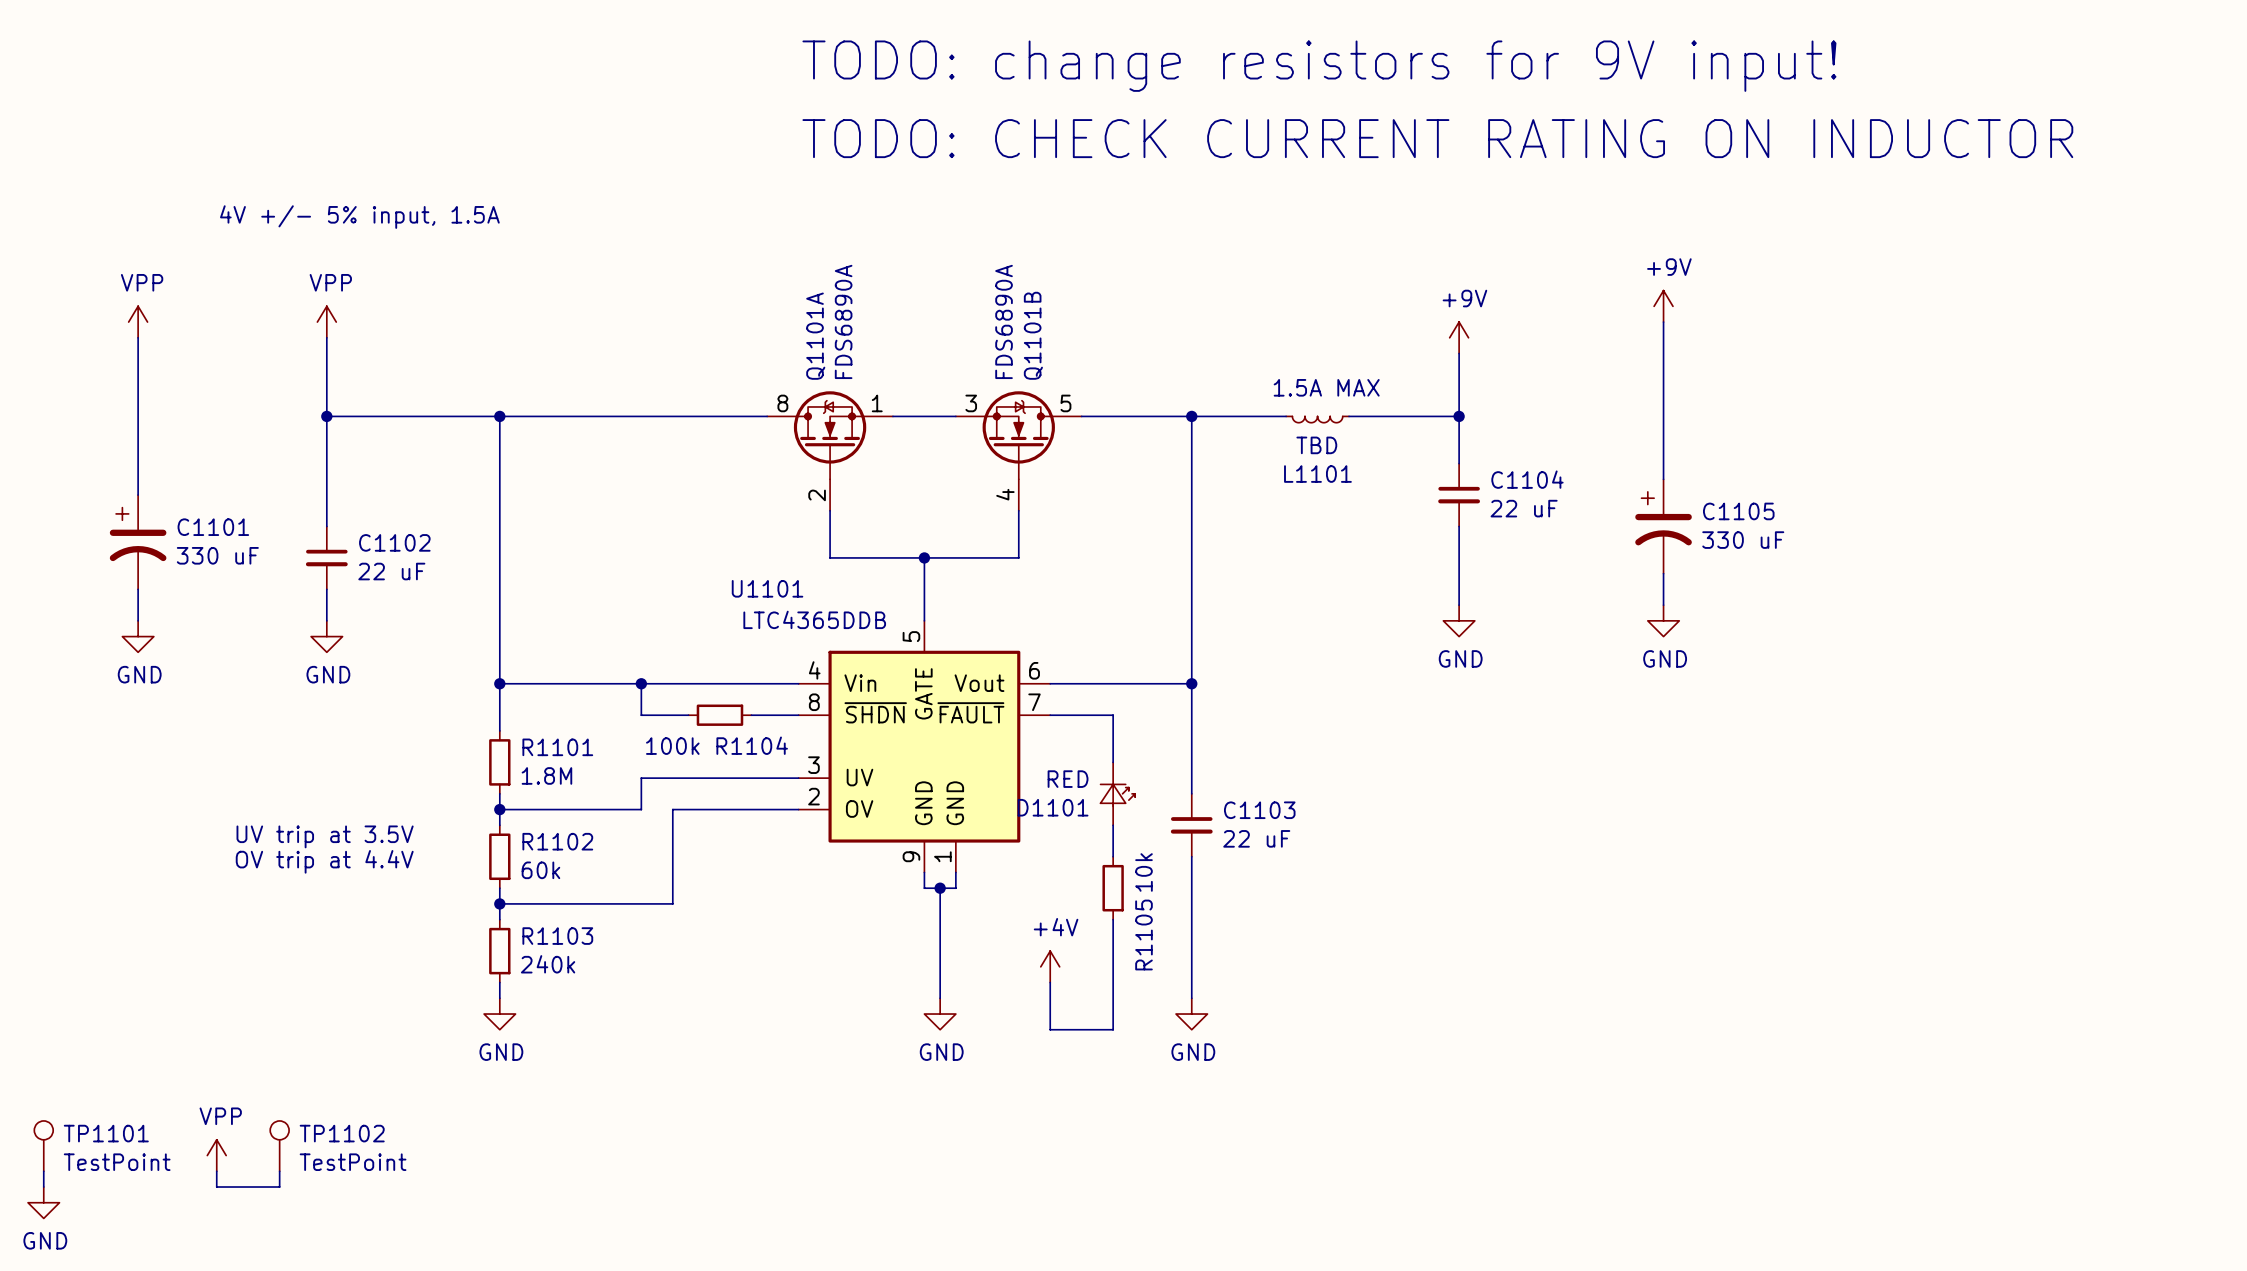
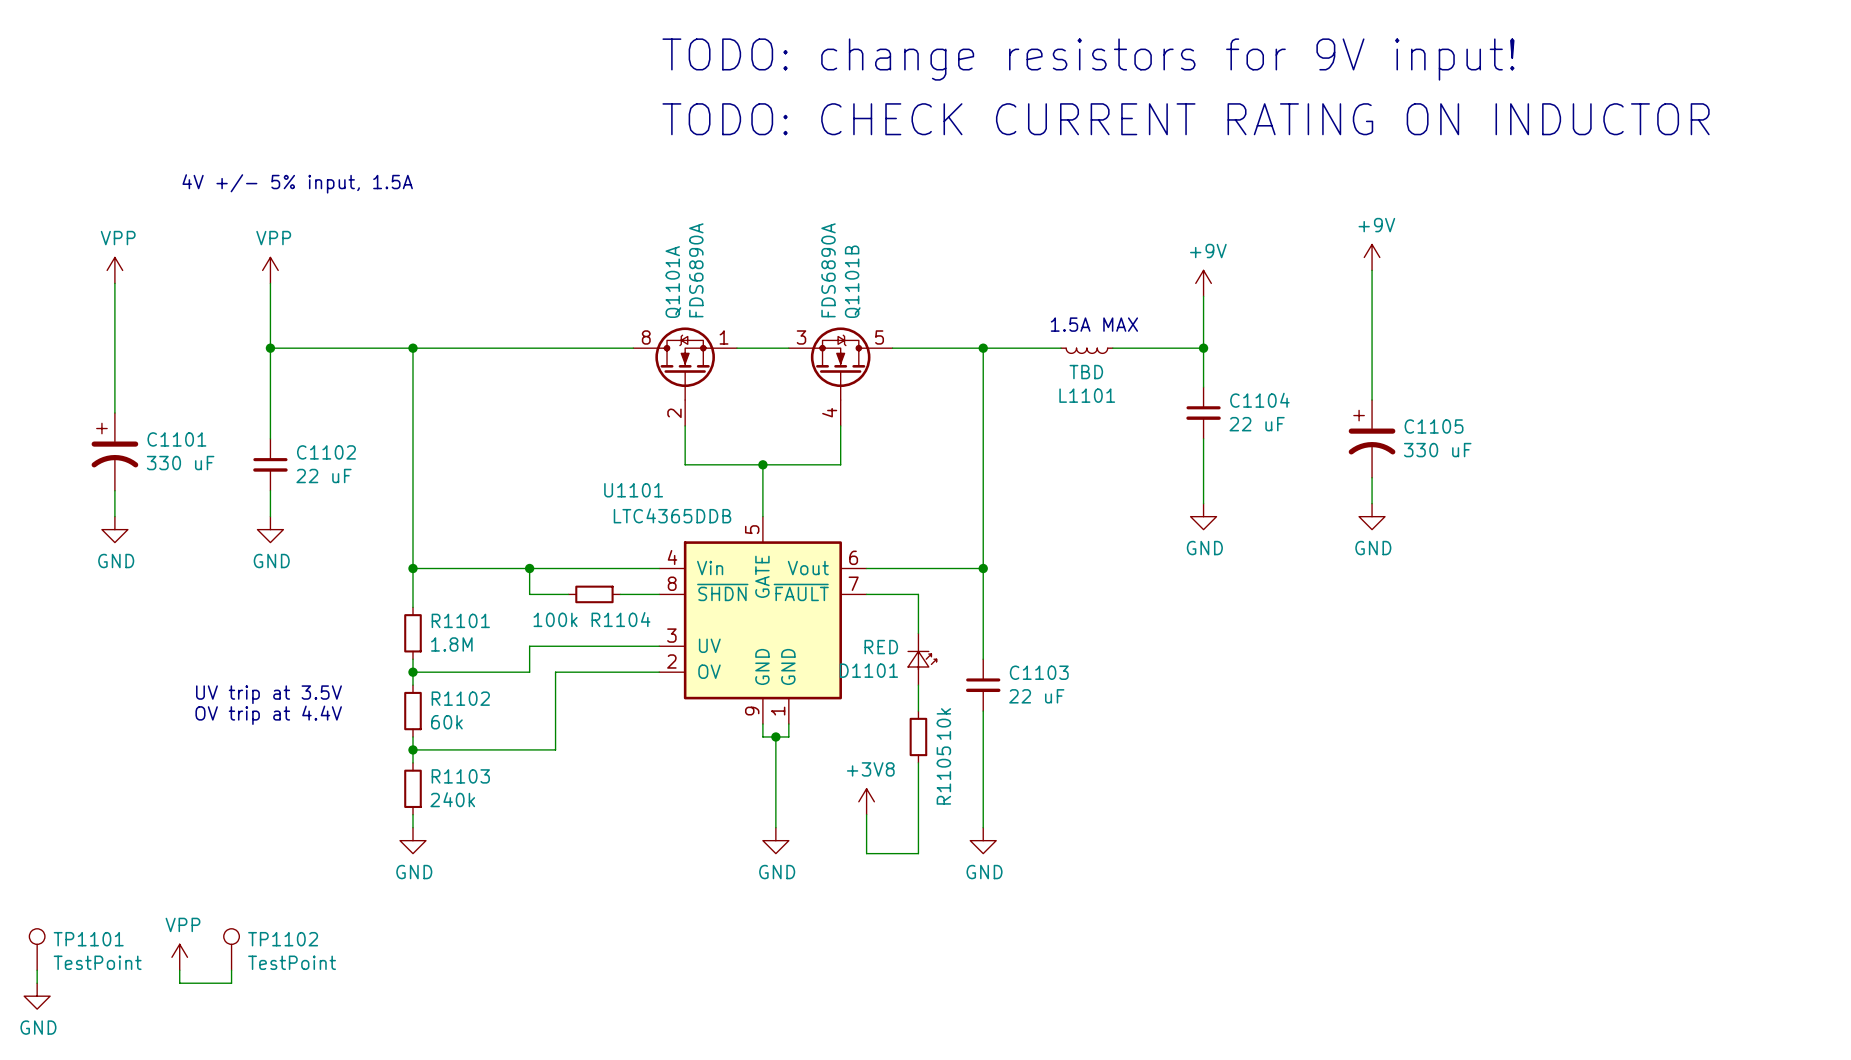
power symbol: +4V (1050, 966) -> +3V8 (866, 801)

